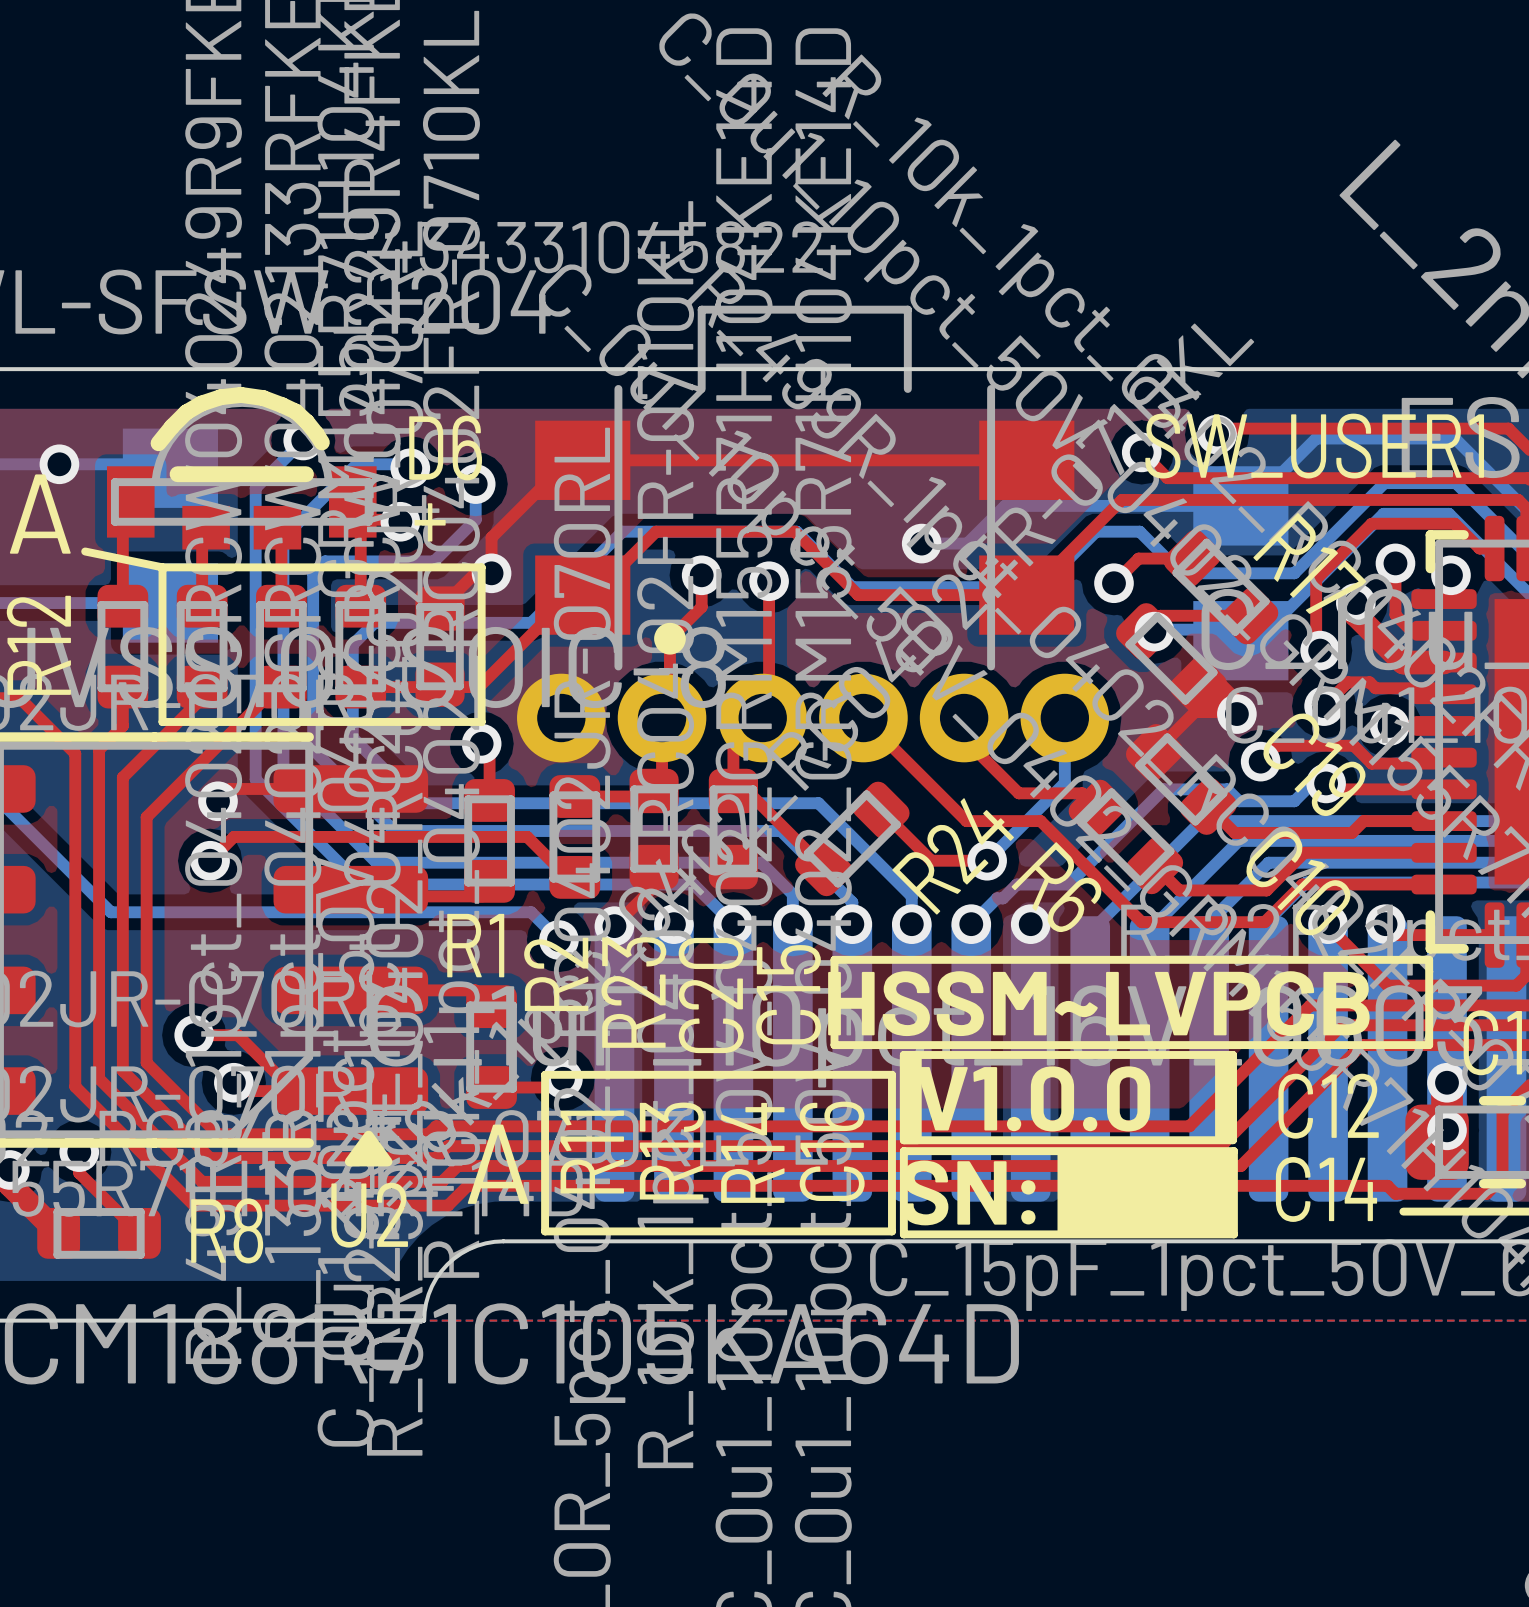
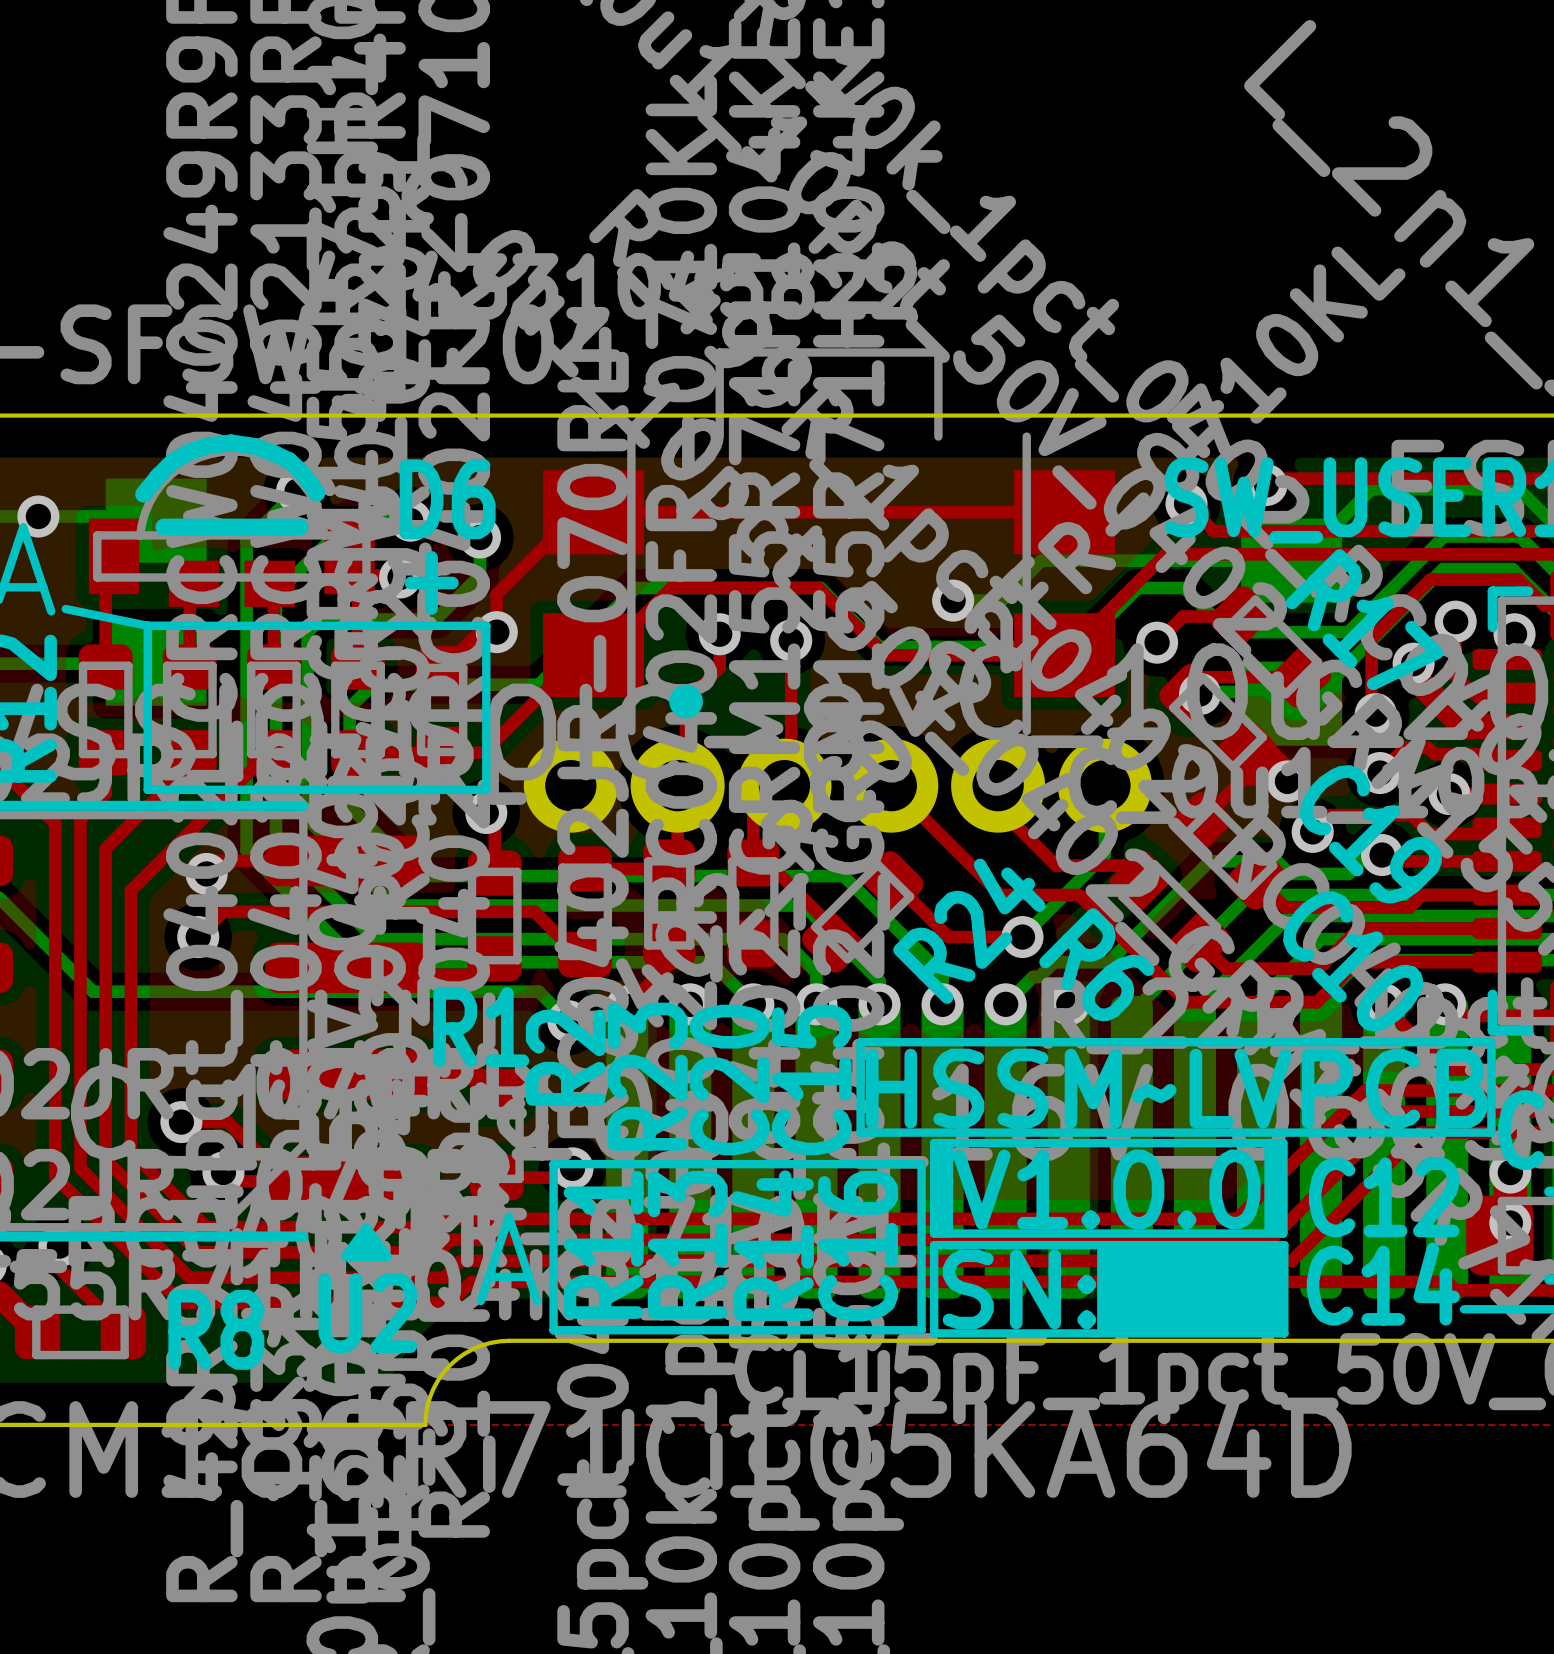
top track: (880, 810) (931, 860) -> (893, 881) (948, 937) (963, 937)
R24 position: (852, 838) -> (862, 911)

